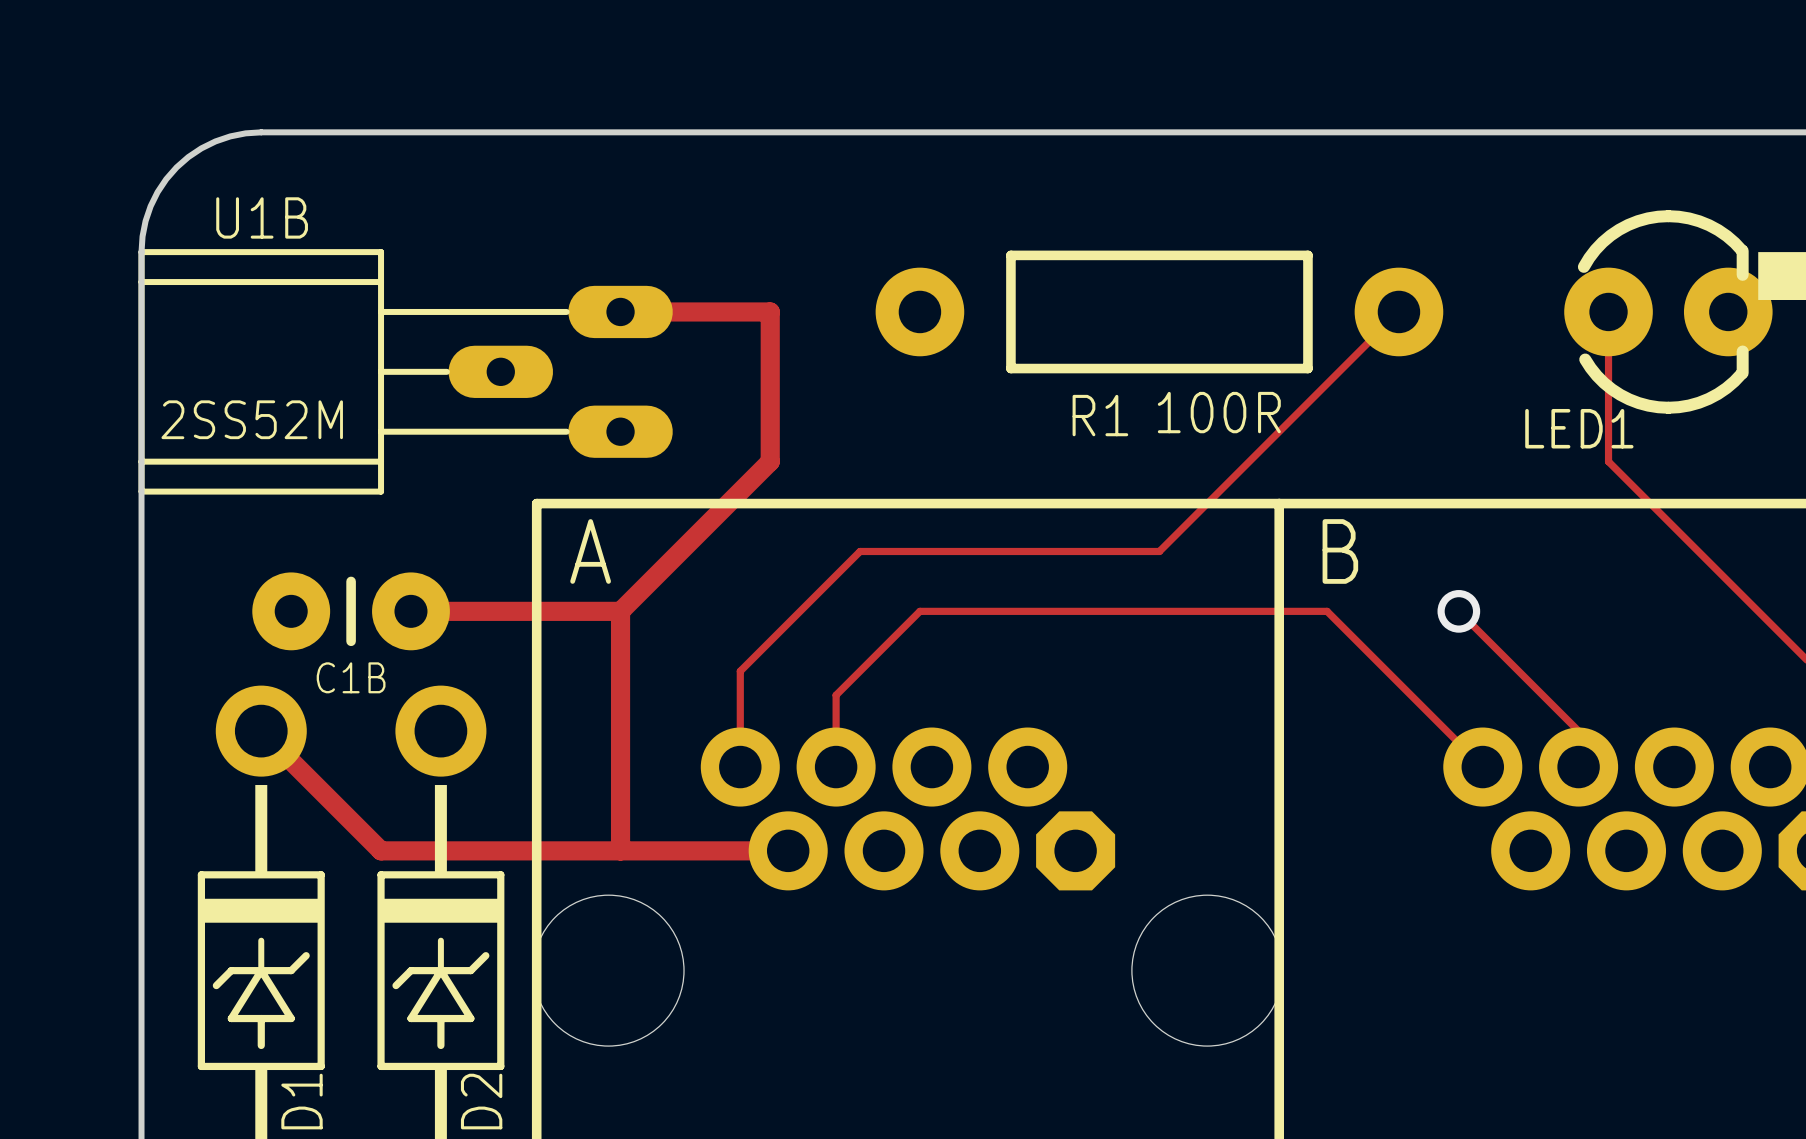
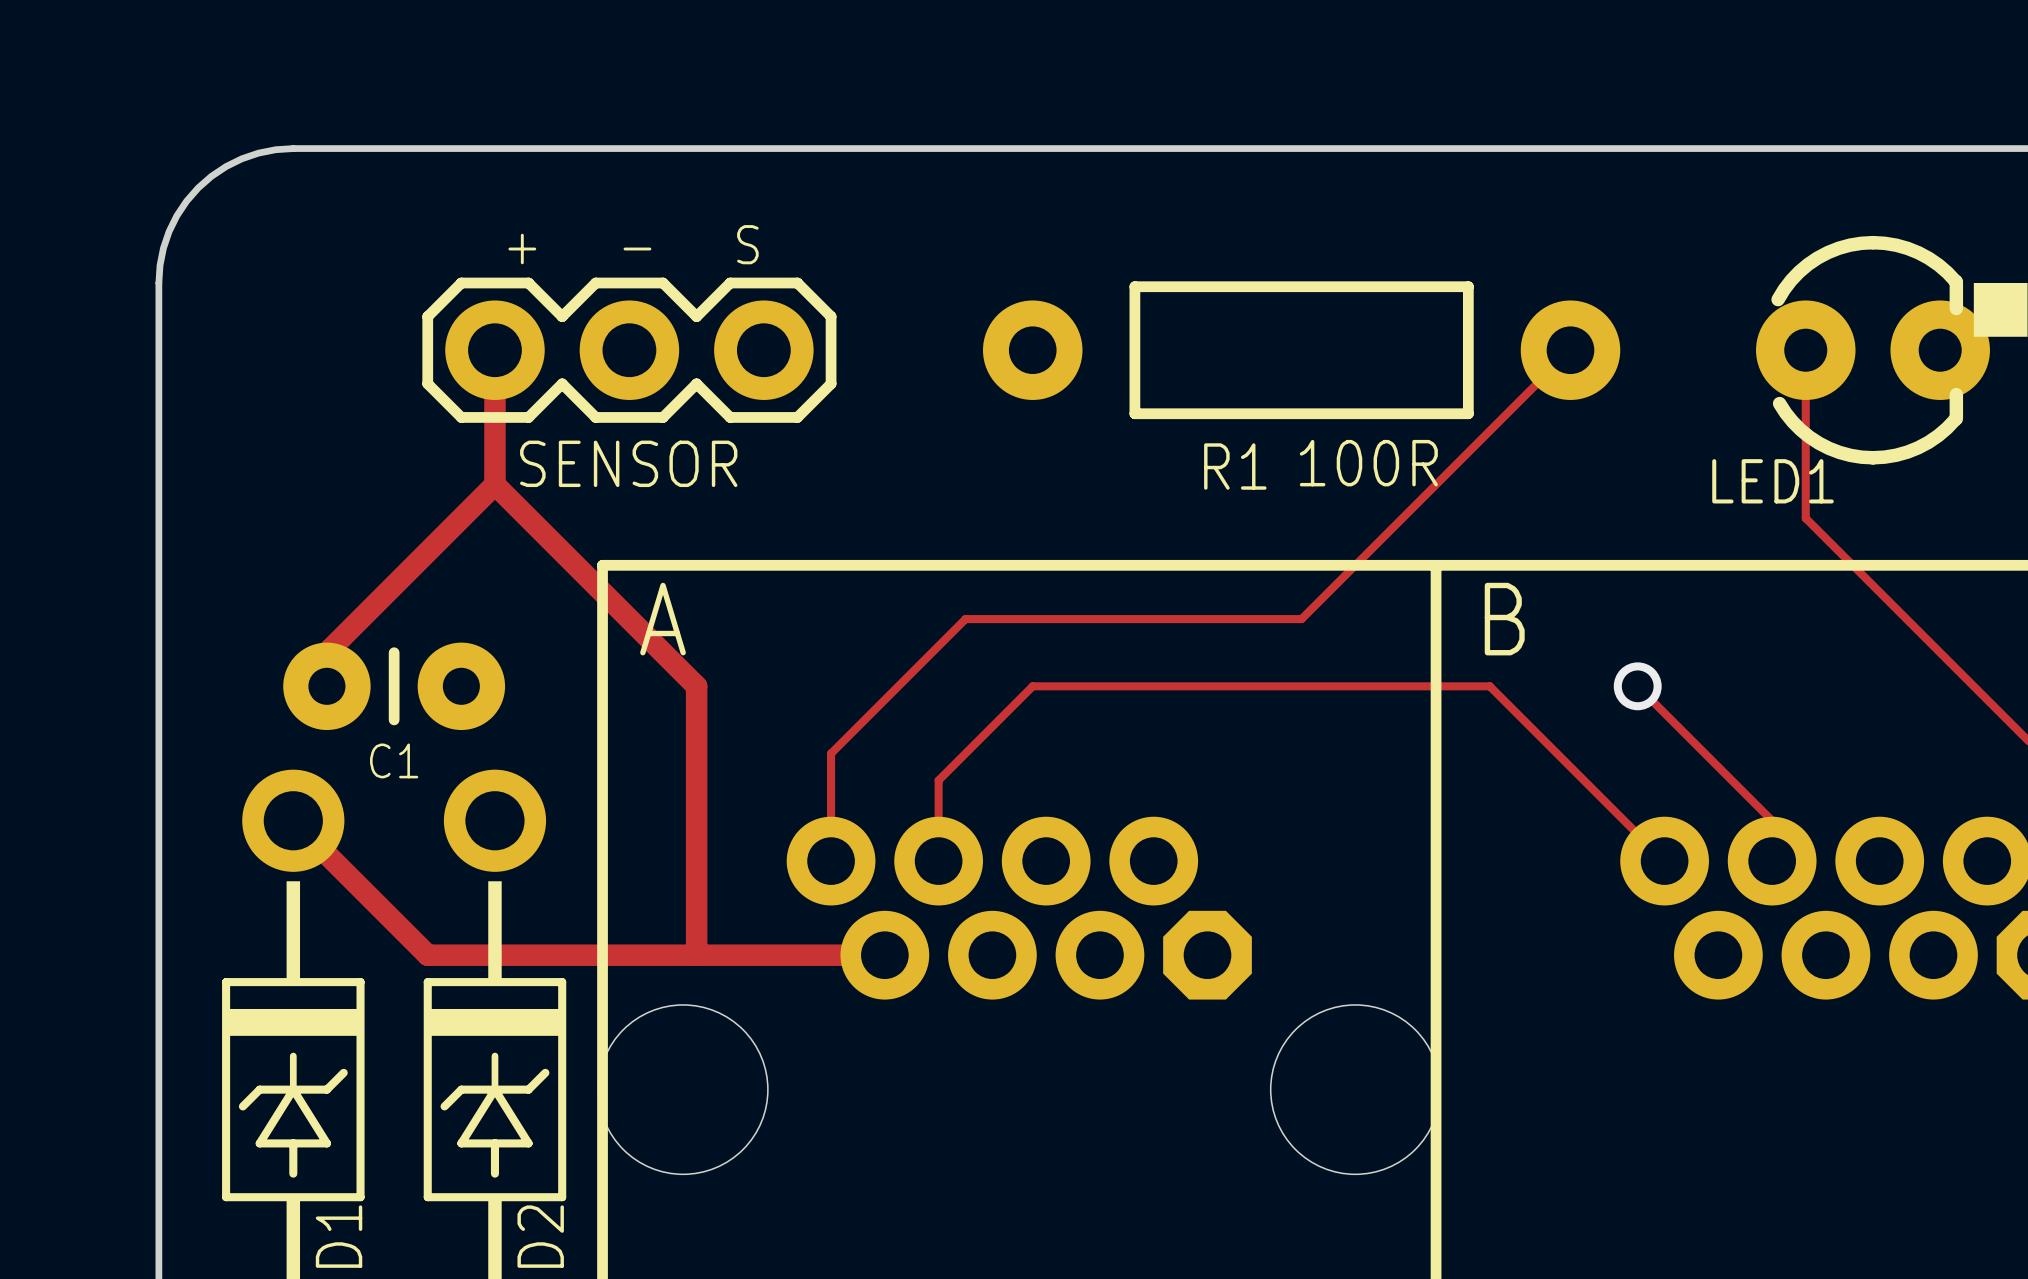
text: none -> + - S (633, 244)
track: none -> (494, 350) (494, 484)
part: none -> (629, 350)
track: (620, 311) (770, 311) (770, 461) (620, 611) (410, 611) -> none
part: (405, 371) -> none
track: none -> (494, 484) (696, 686)
track: none -> (494, 484) (330, 649) (330, 686)
part text: C1B (351, 677) -> C1 (394, 760)

